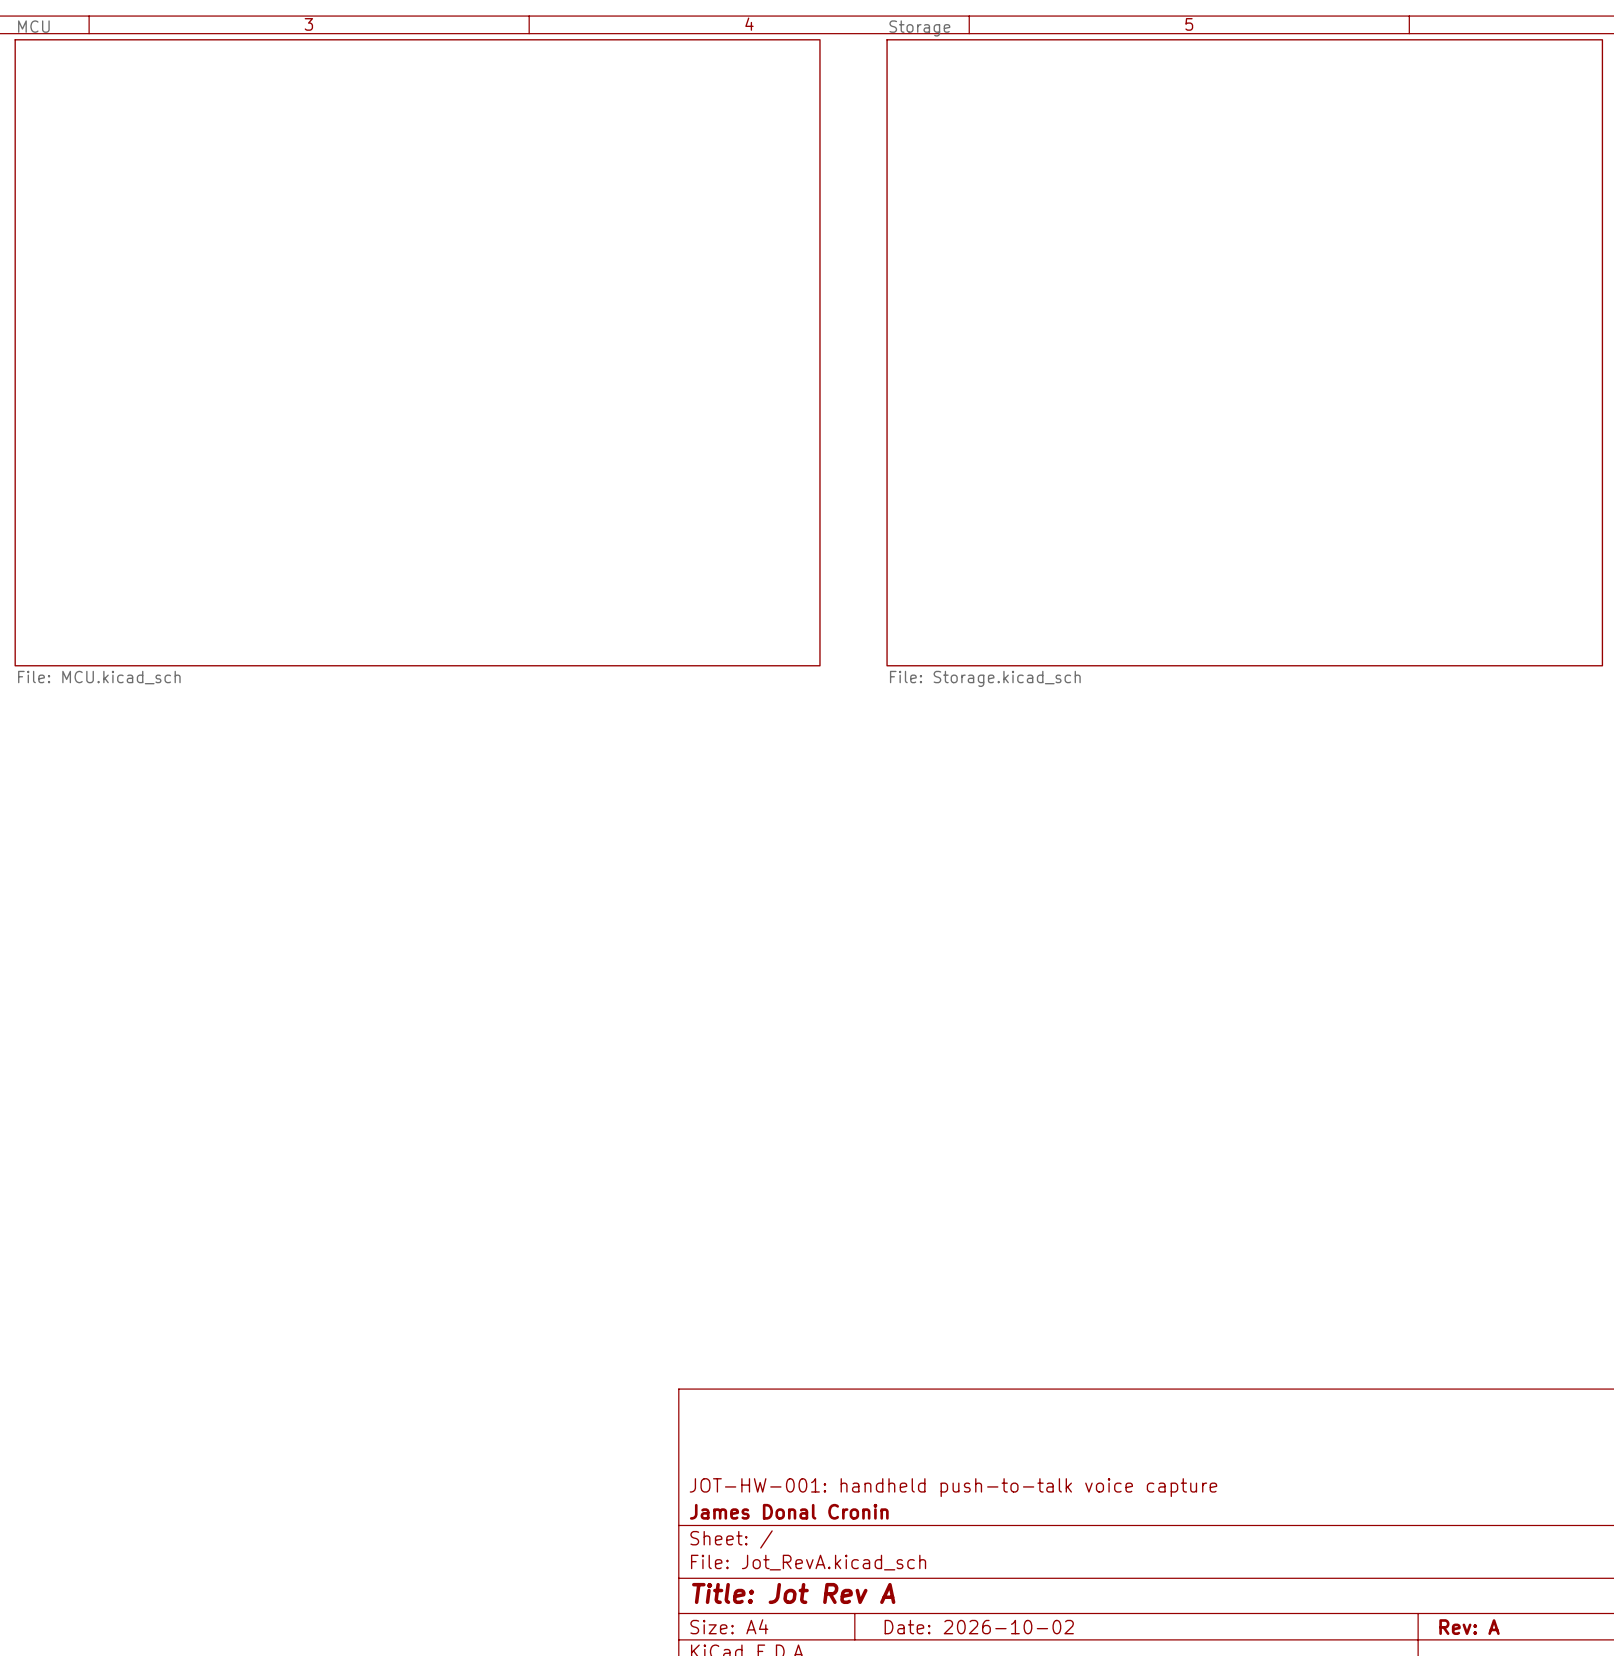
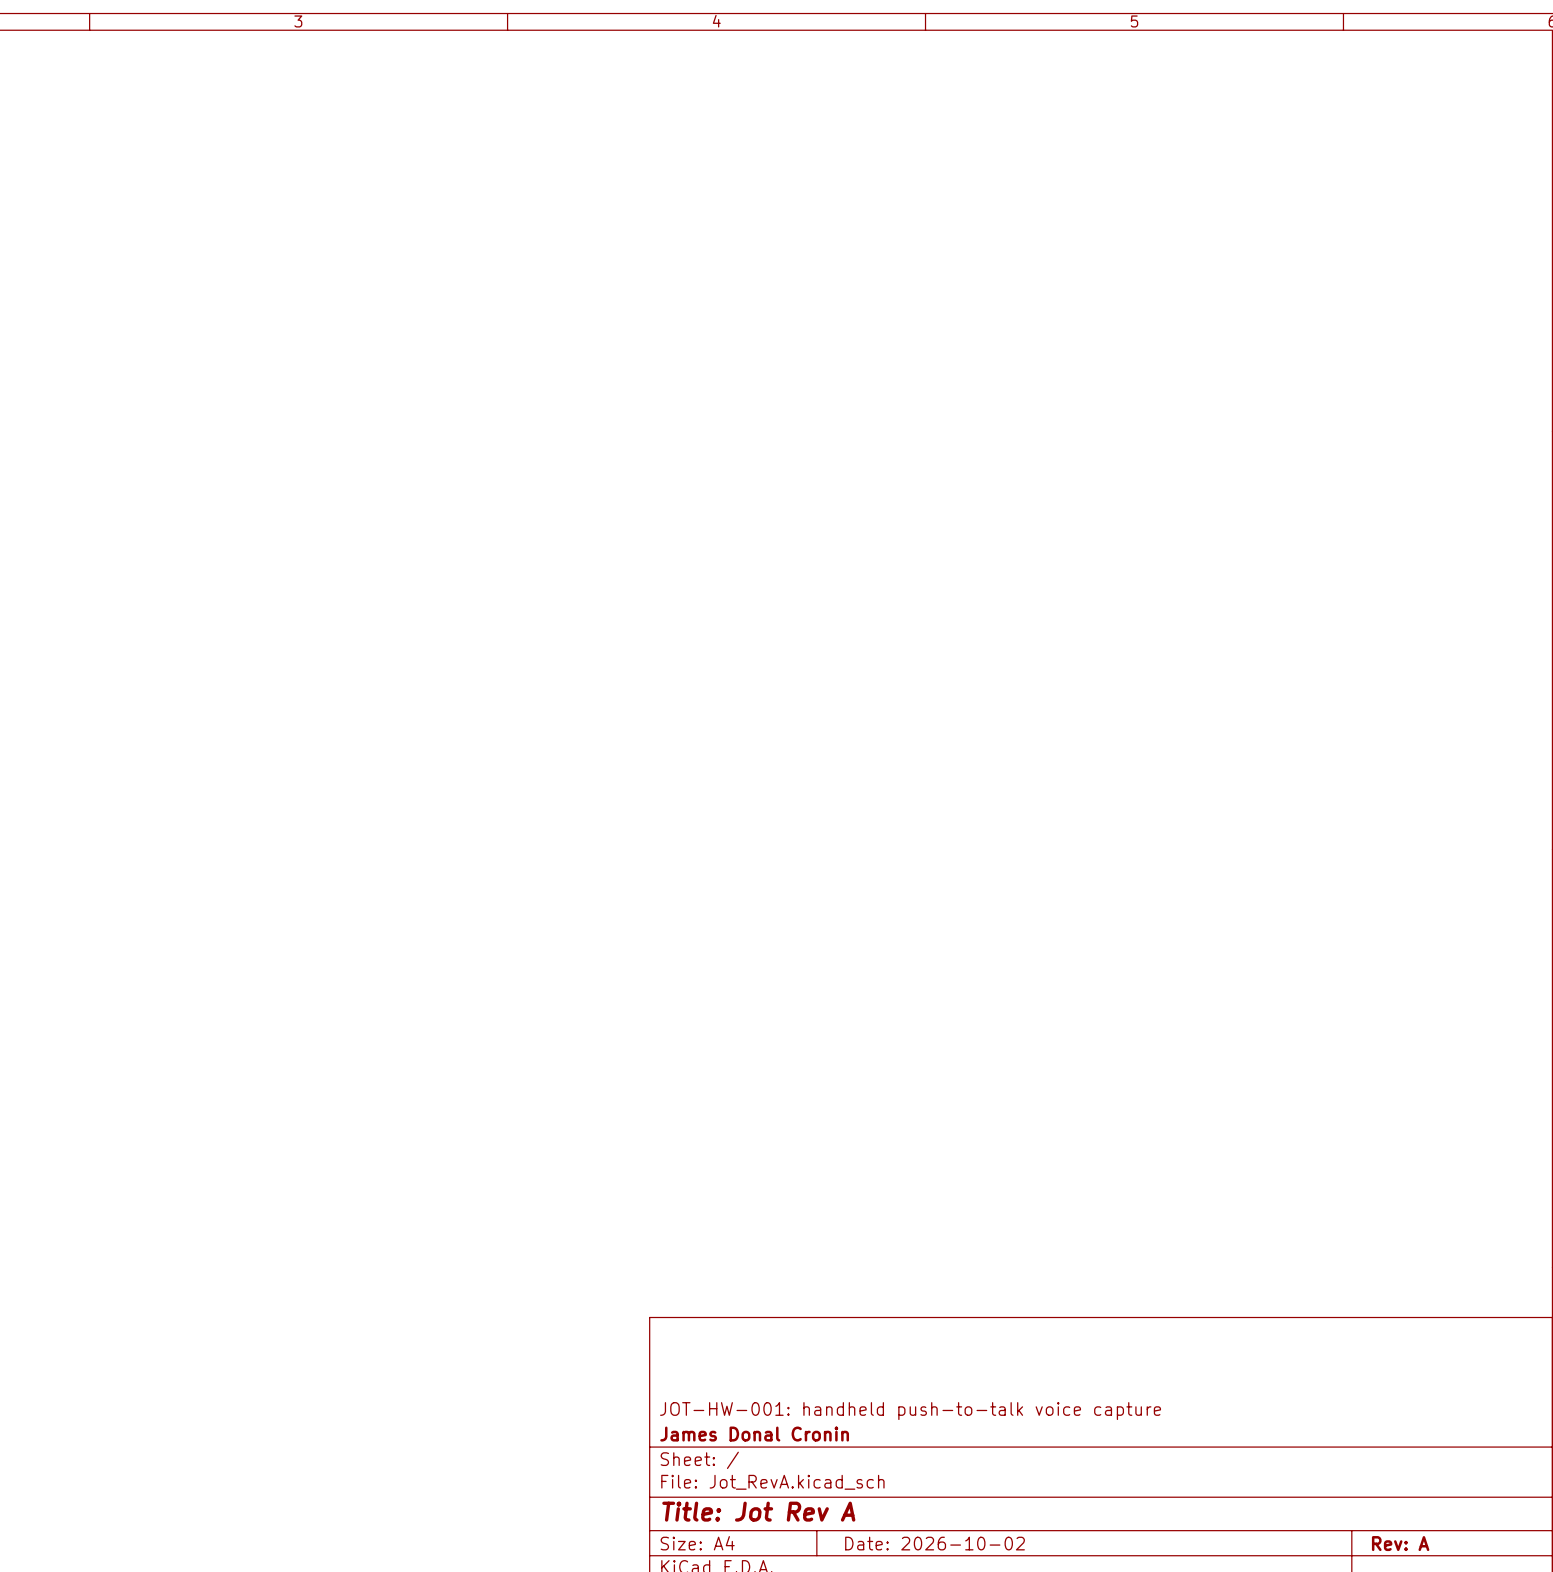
sheet MCU: File: MCU.kicad_sch (417, 352) -> none
sheet Storage: File: Storage.kicad_sch (1244, 352) -> none

